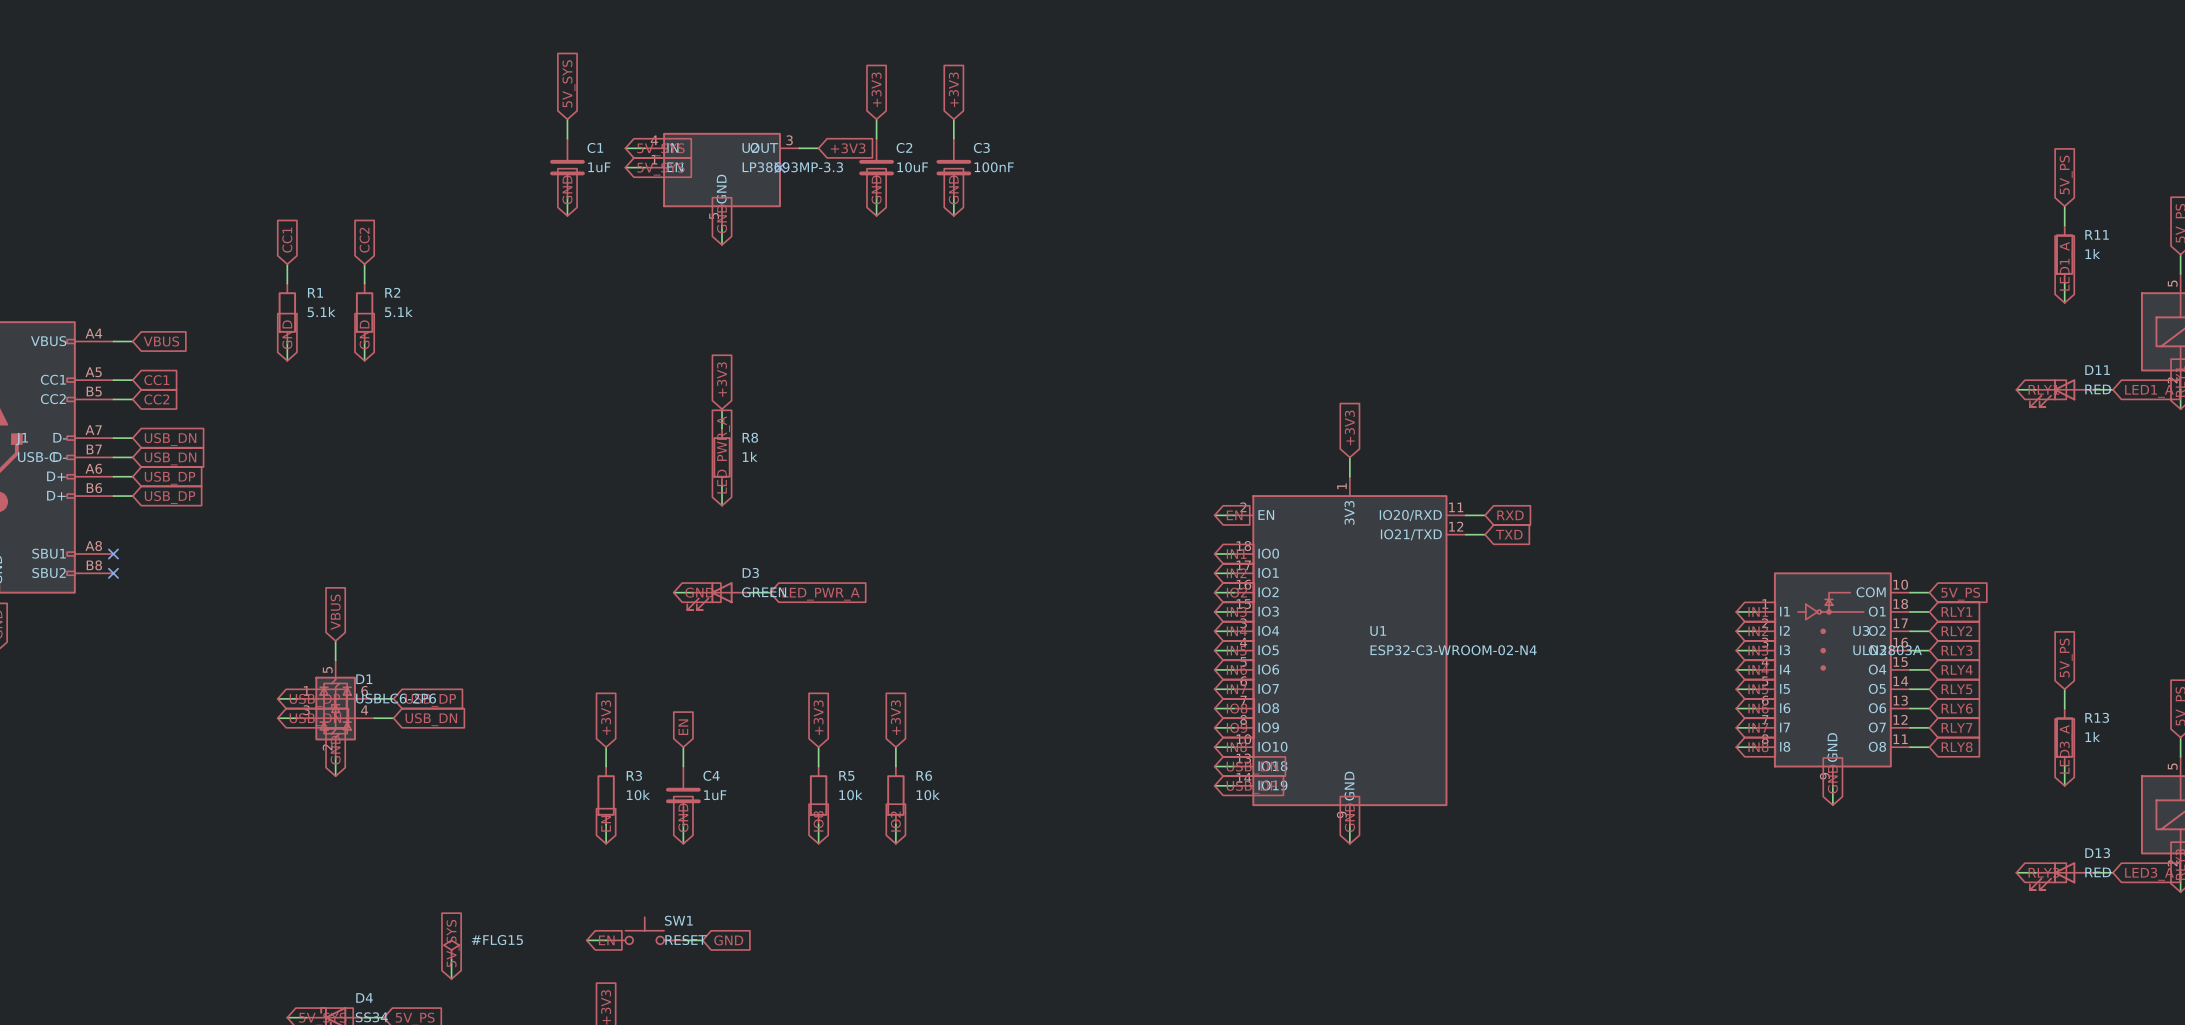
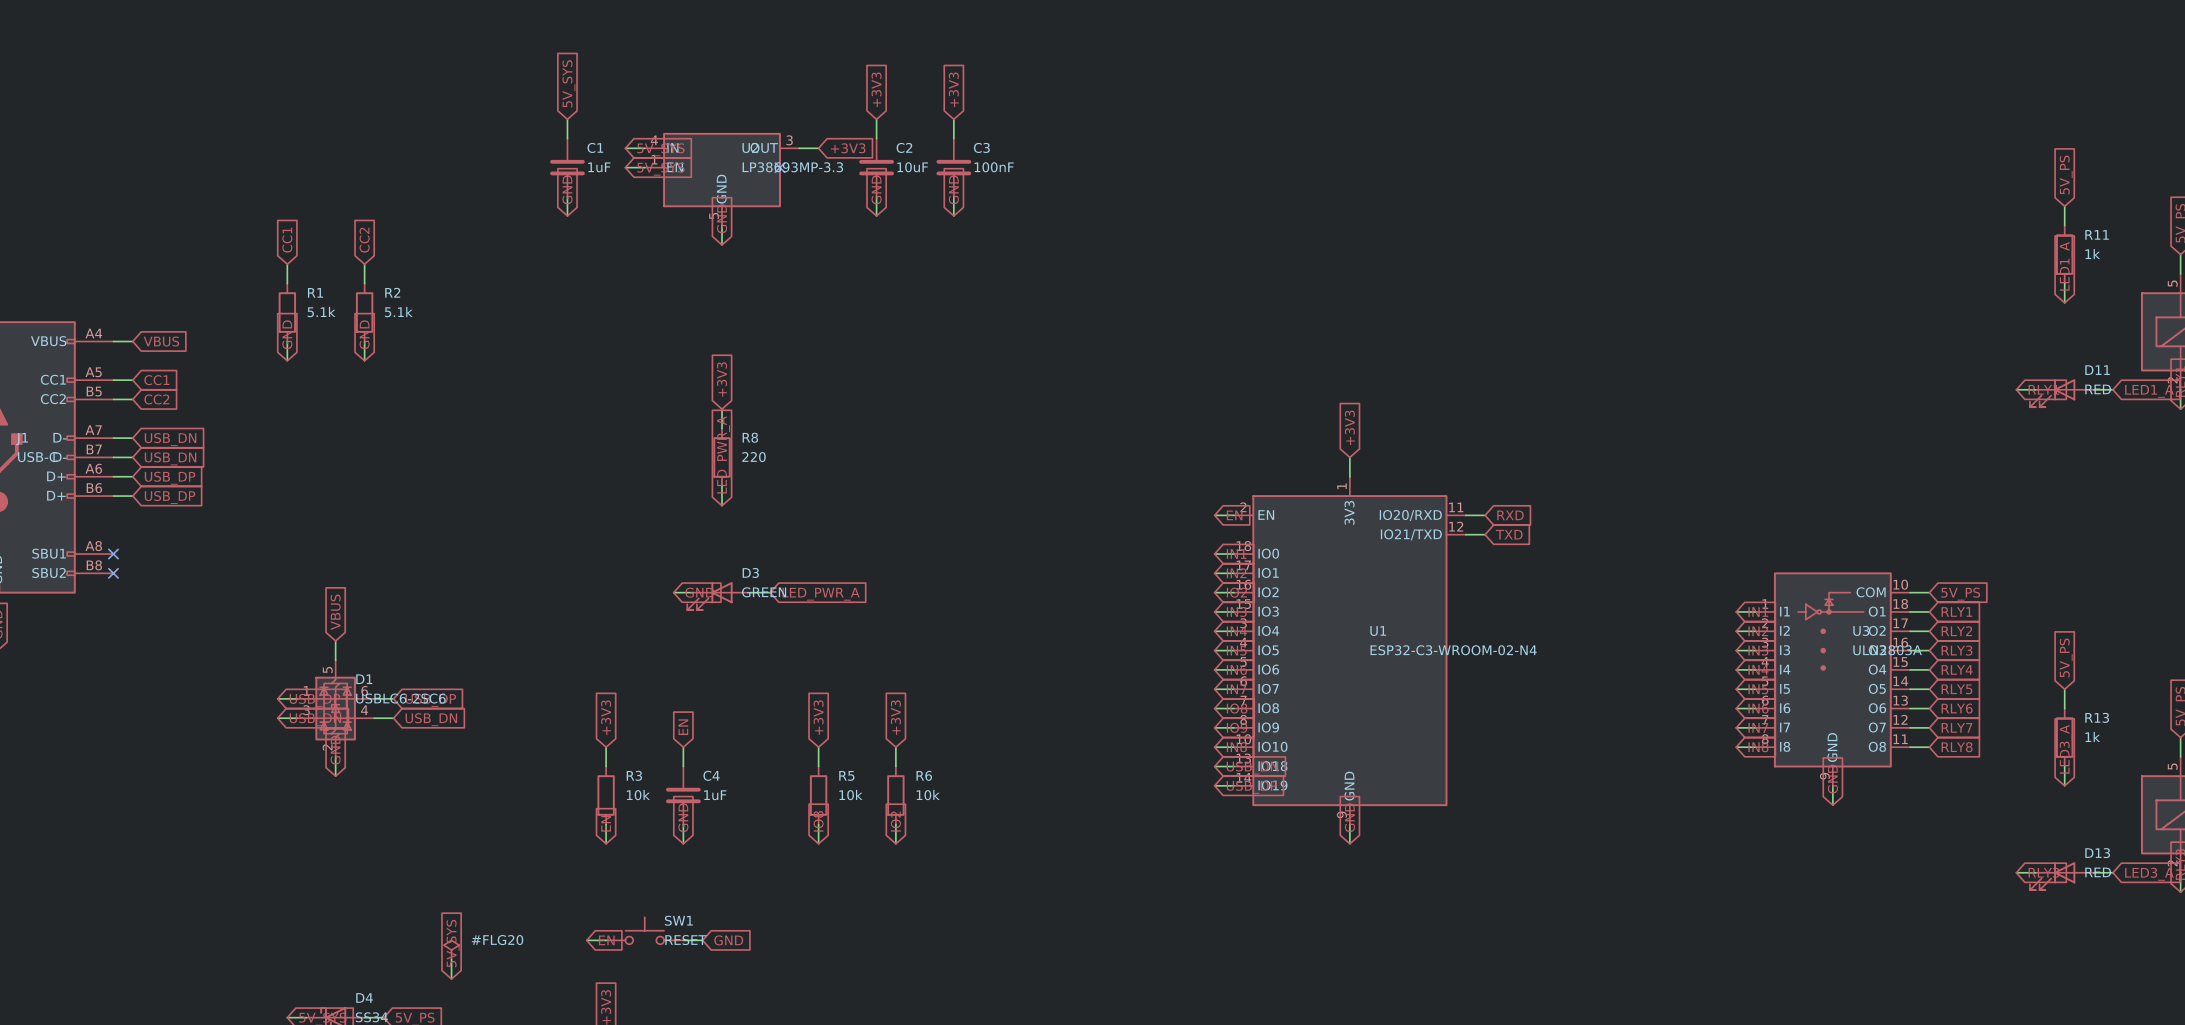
R8 value: 1k (750, 456) -> 220 (754, 457)
D1 value: USBLC6-2P6 (396, 698) -> USBLC6-2SC6 (400, 698)
#FLG15 name: #FLG15 (497, 940) -> #FLG20 (497, 940)

